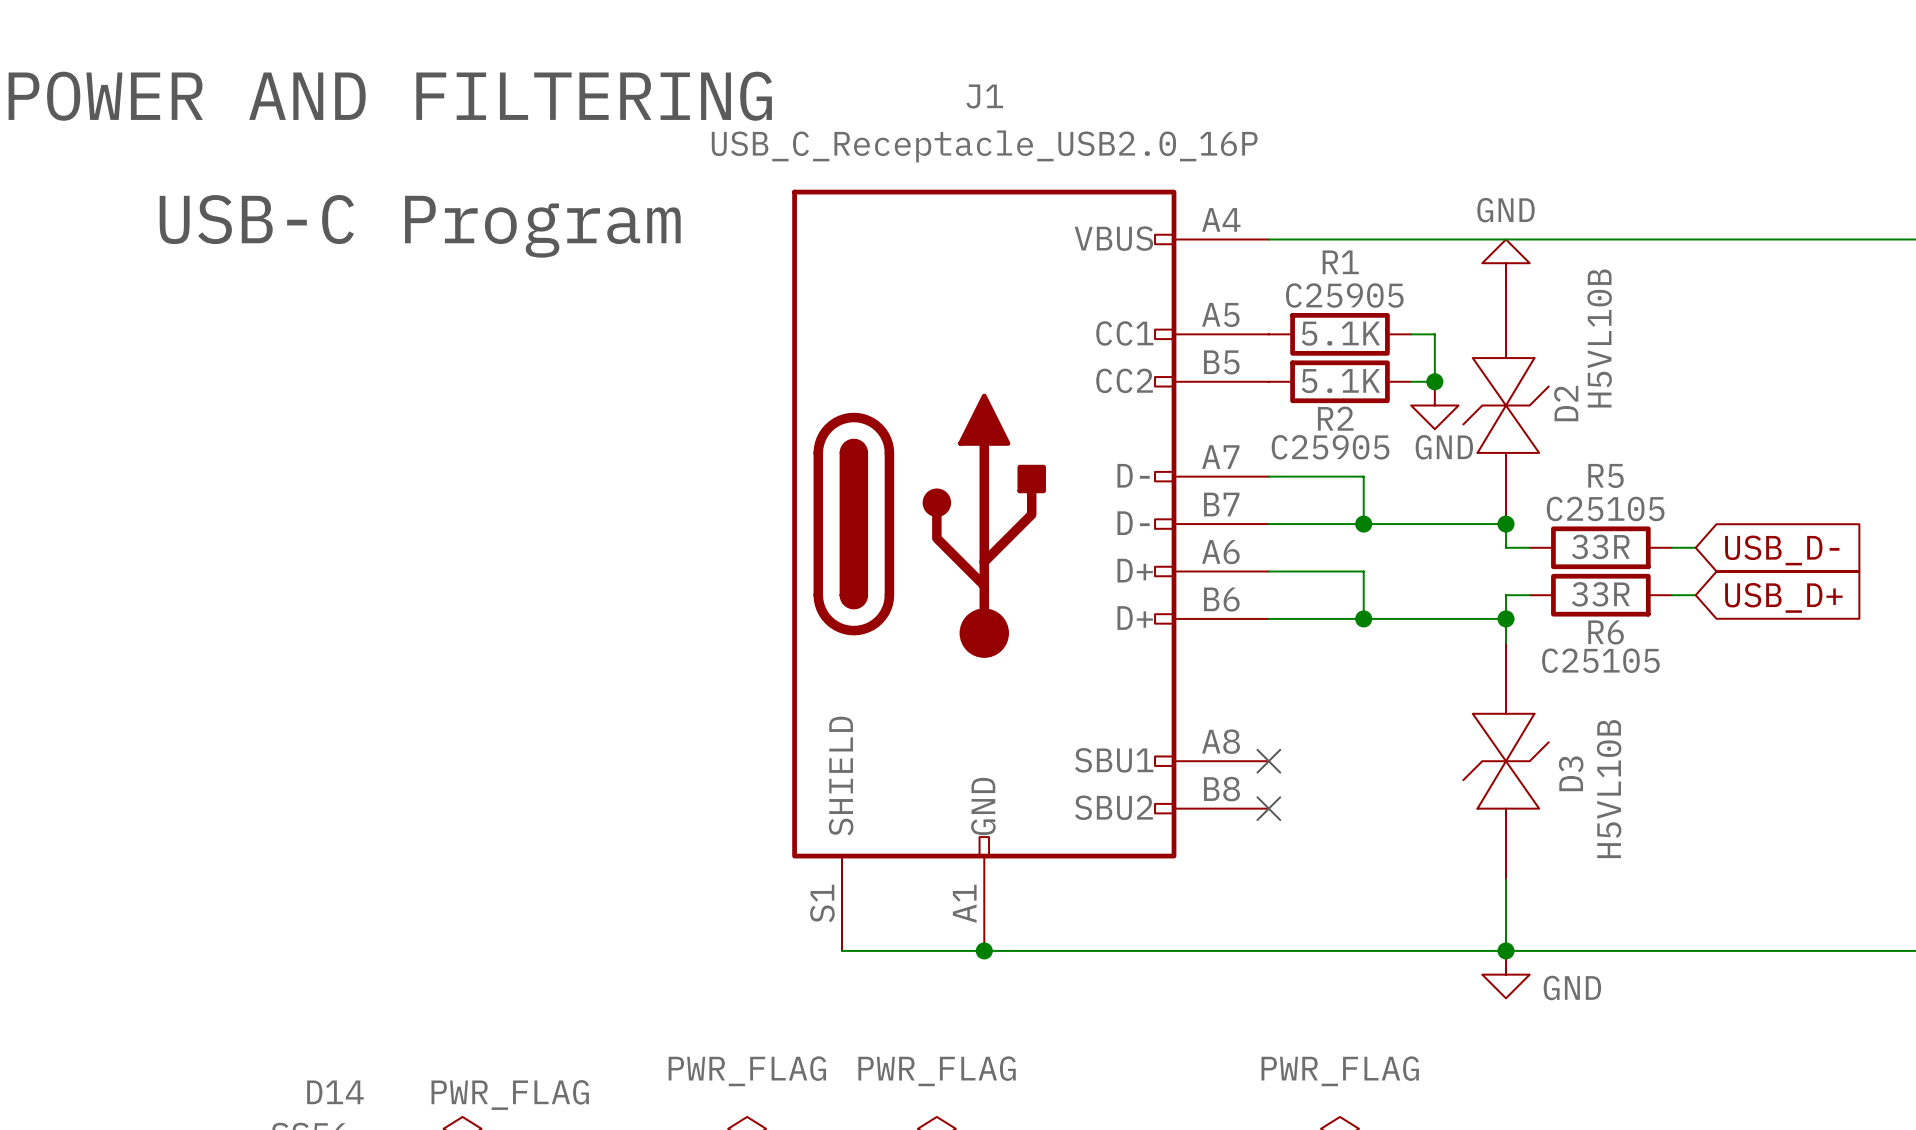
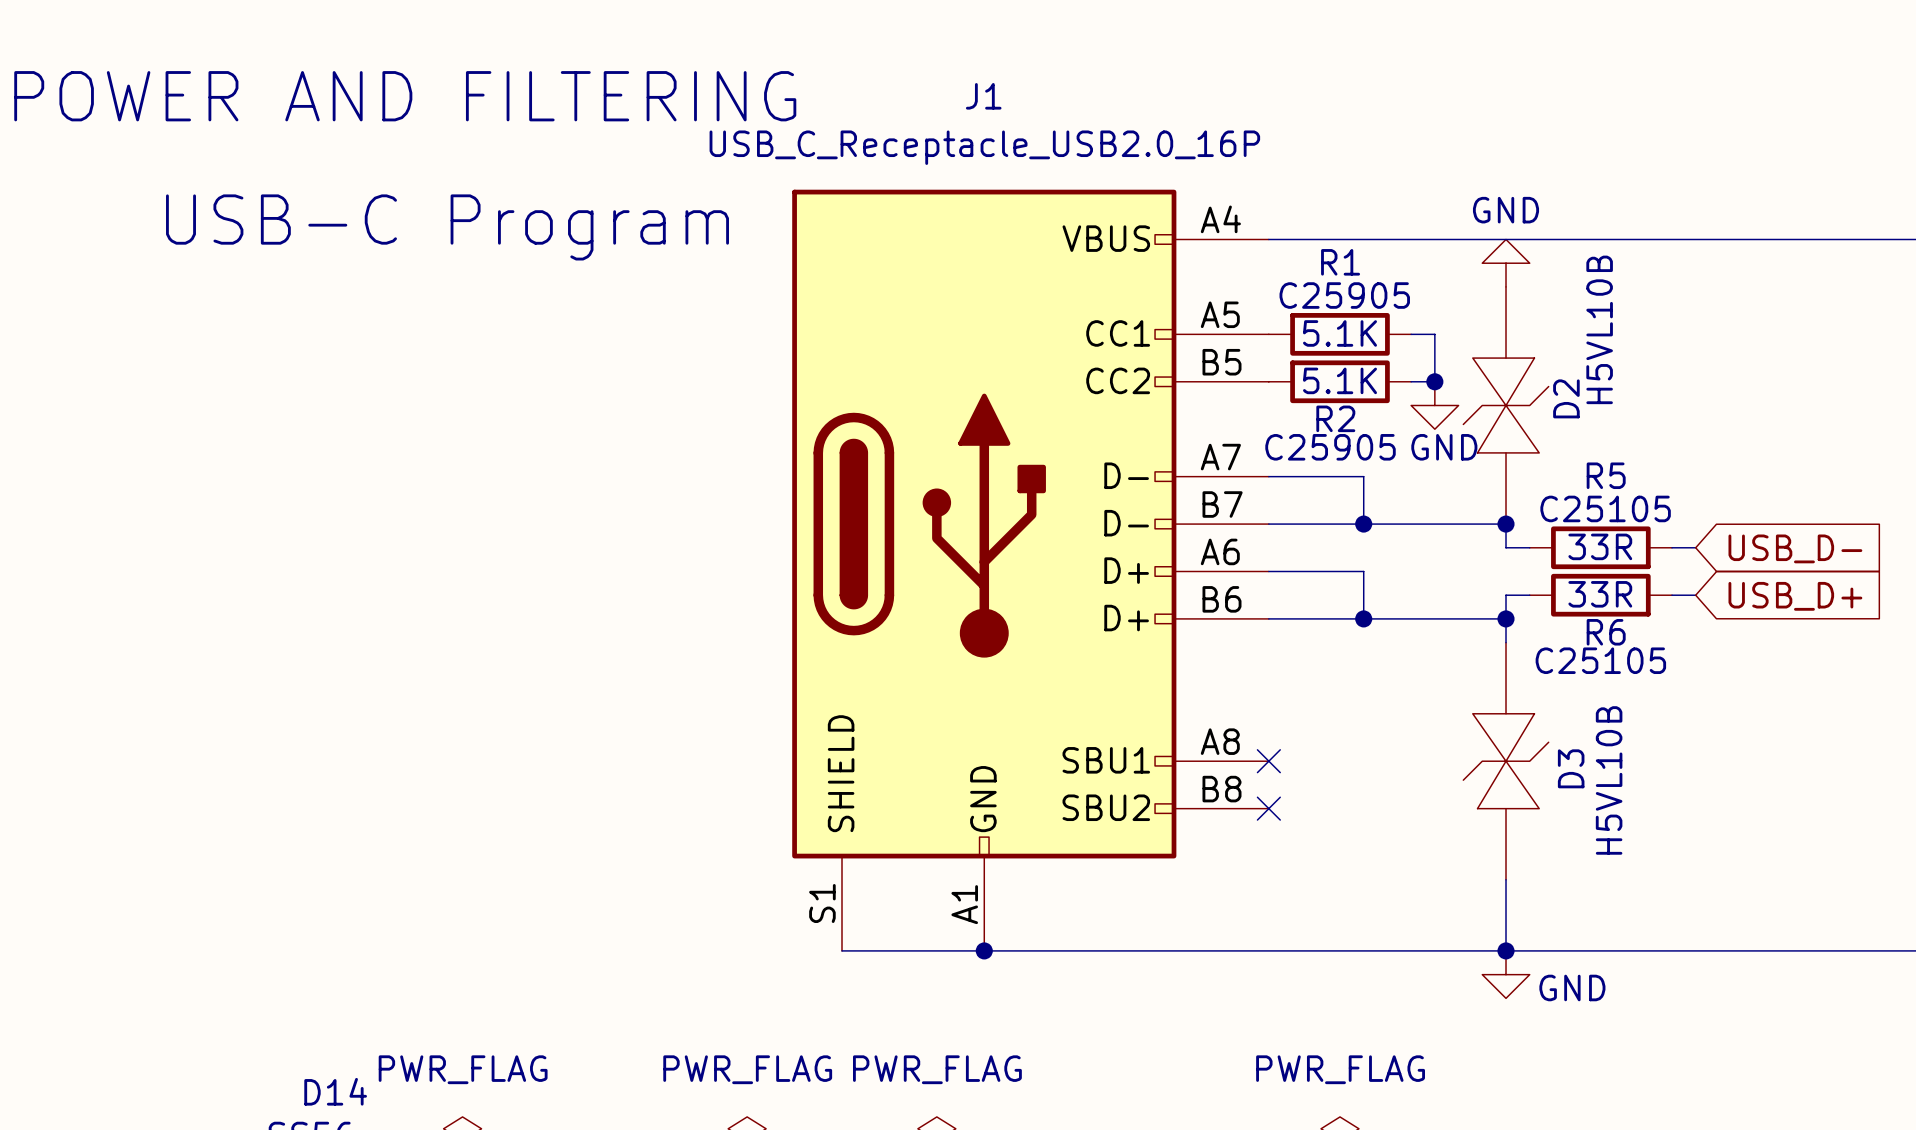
power symbol text position: PWR_FLAG (510, 1094) -> PWR_FLAG (463, 1069)

